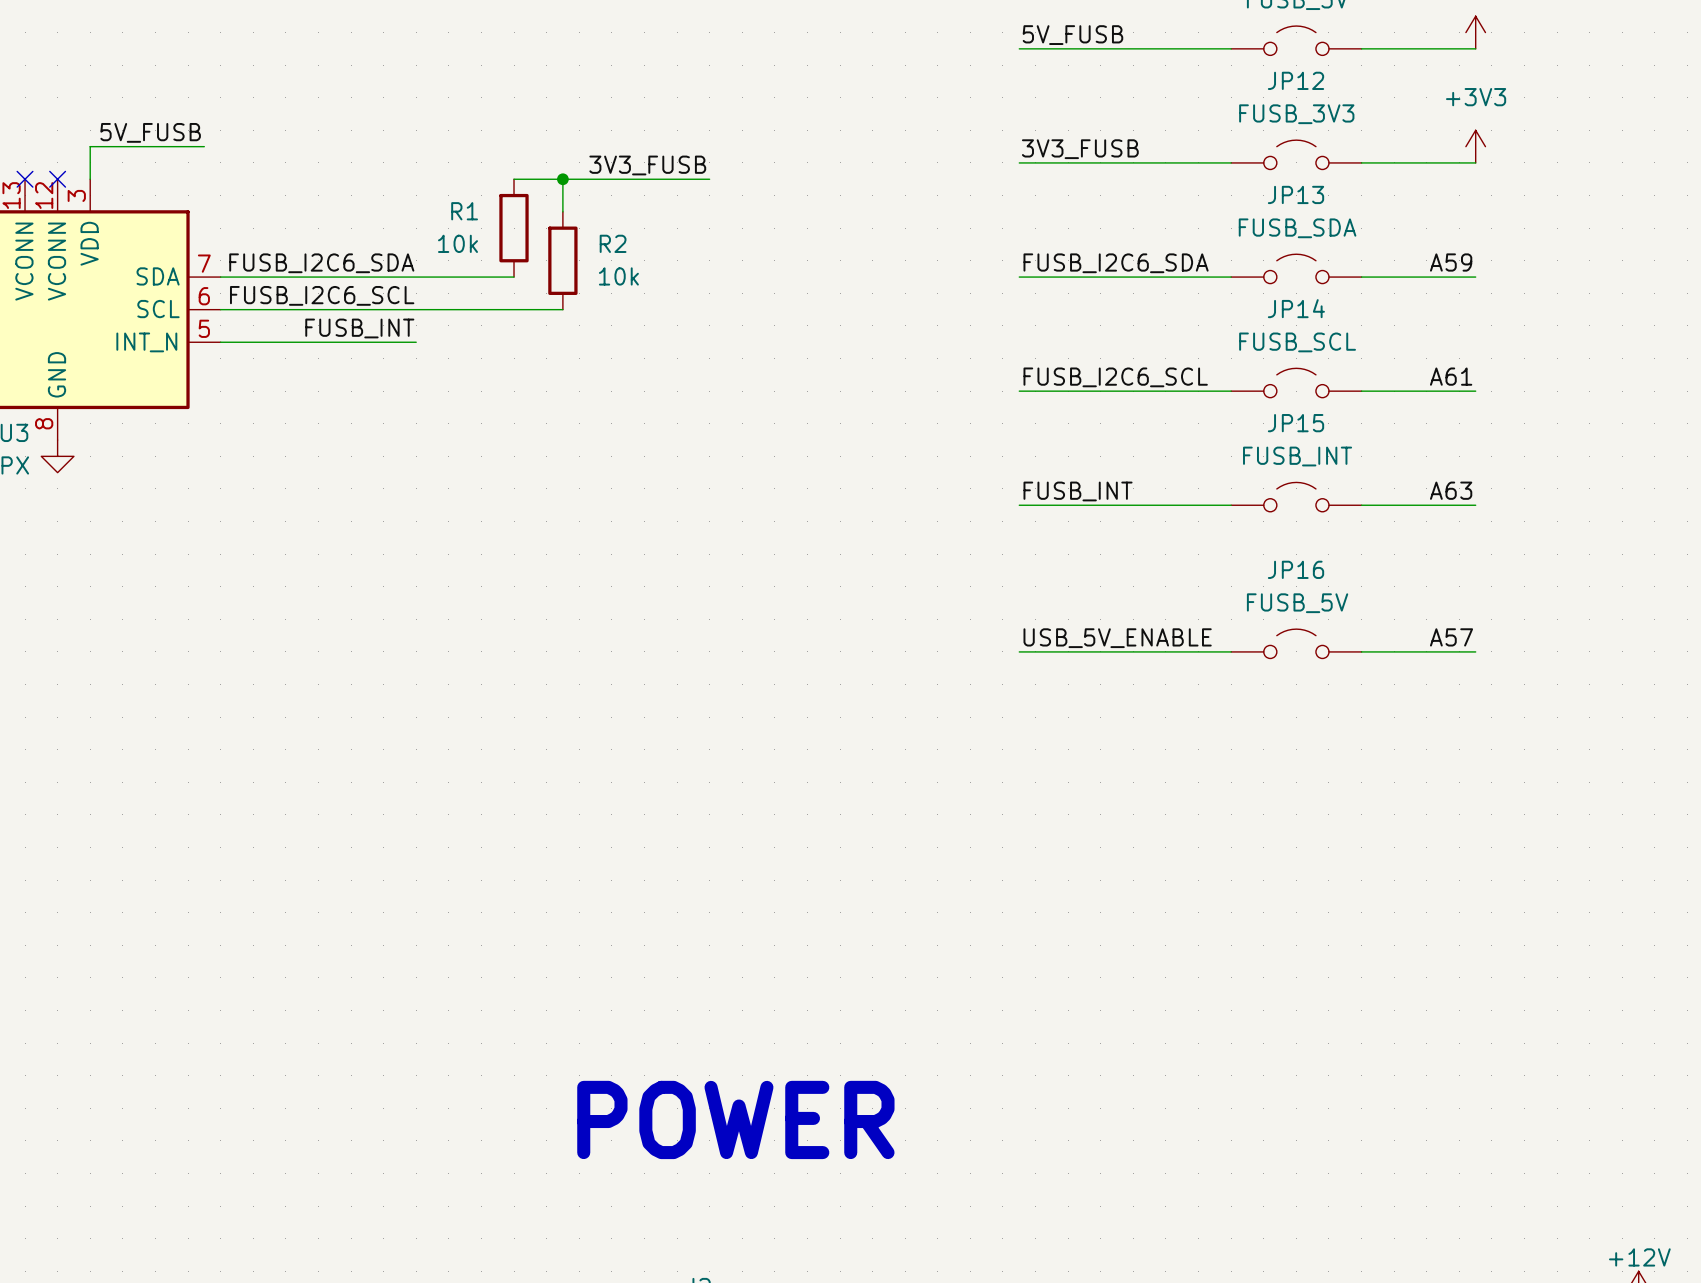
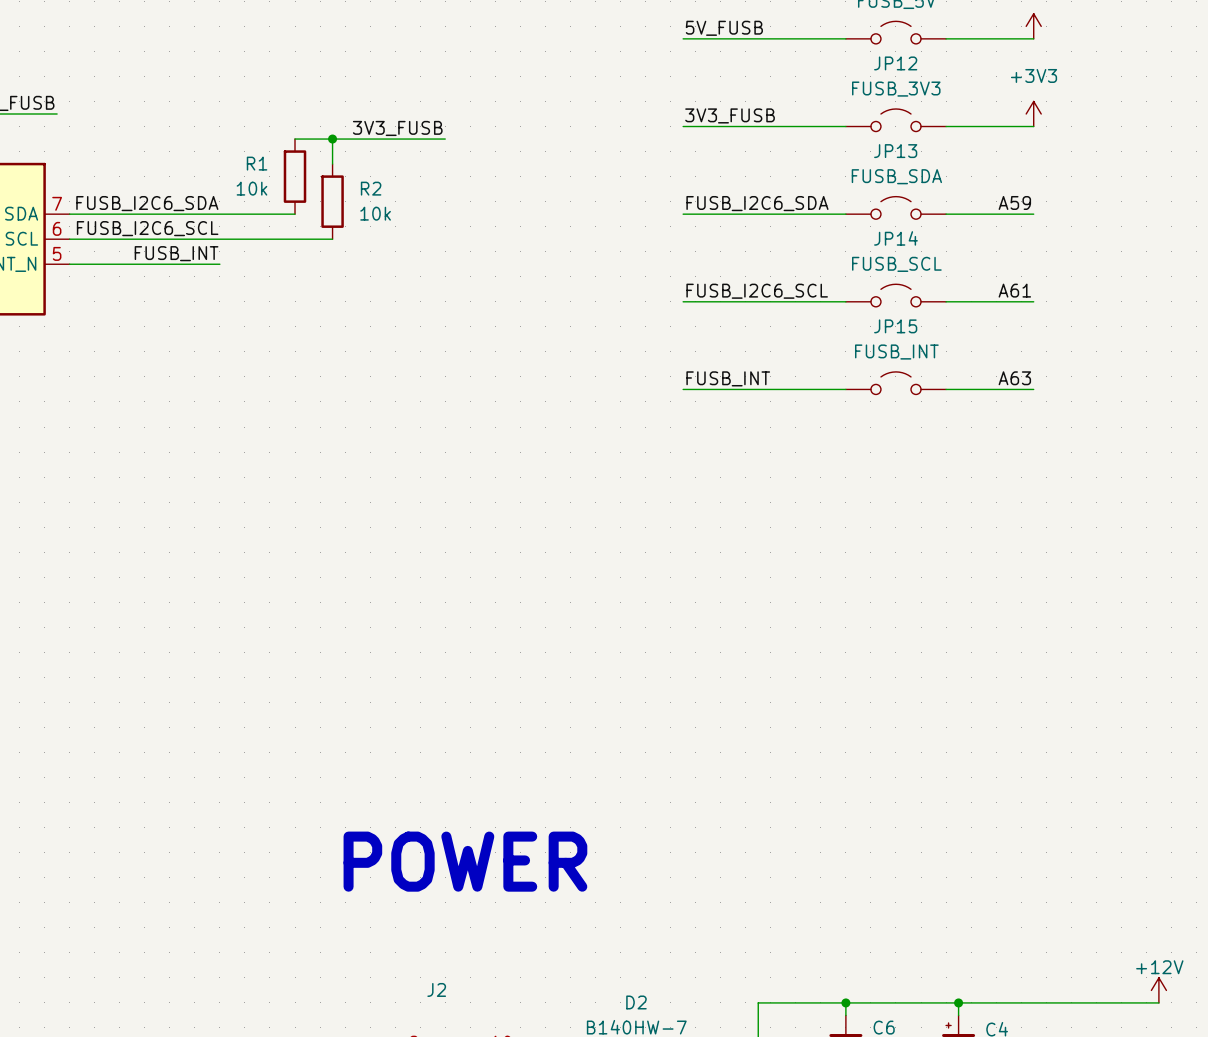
label: A57 (1451, 637) -> none
label: USB_5V_ENABLE (1117, 638) -> none
JP16: (1296, 643) -> none
wire: (1019, 651) (1231, 651) -> none
wire: (1361, 651) (1475, 651) -> none

